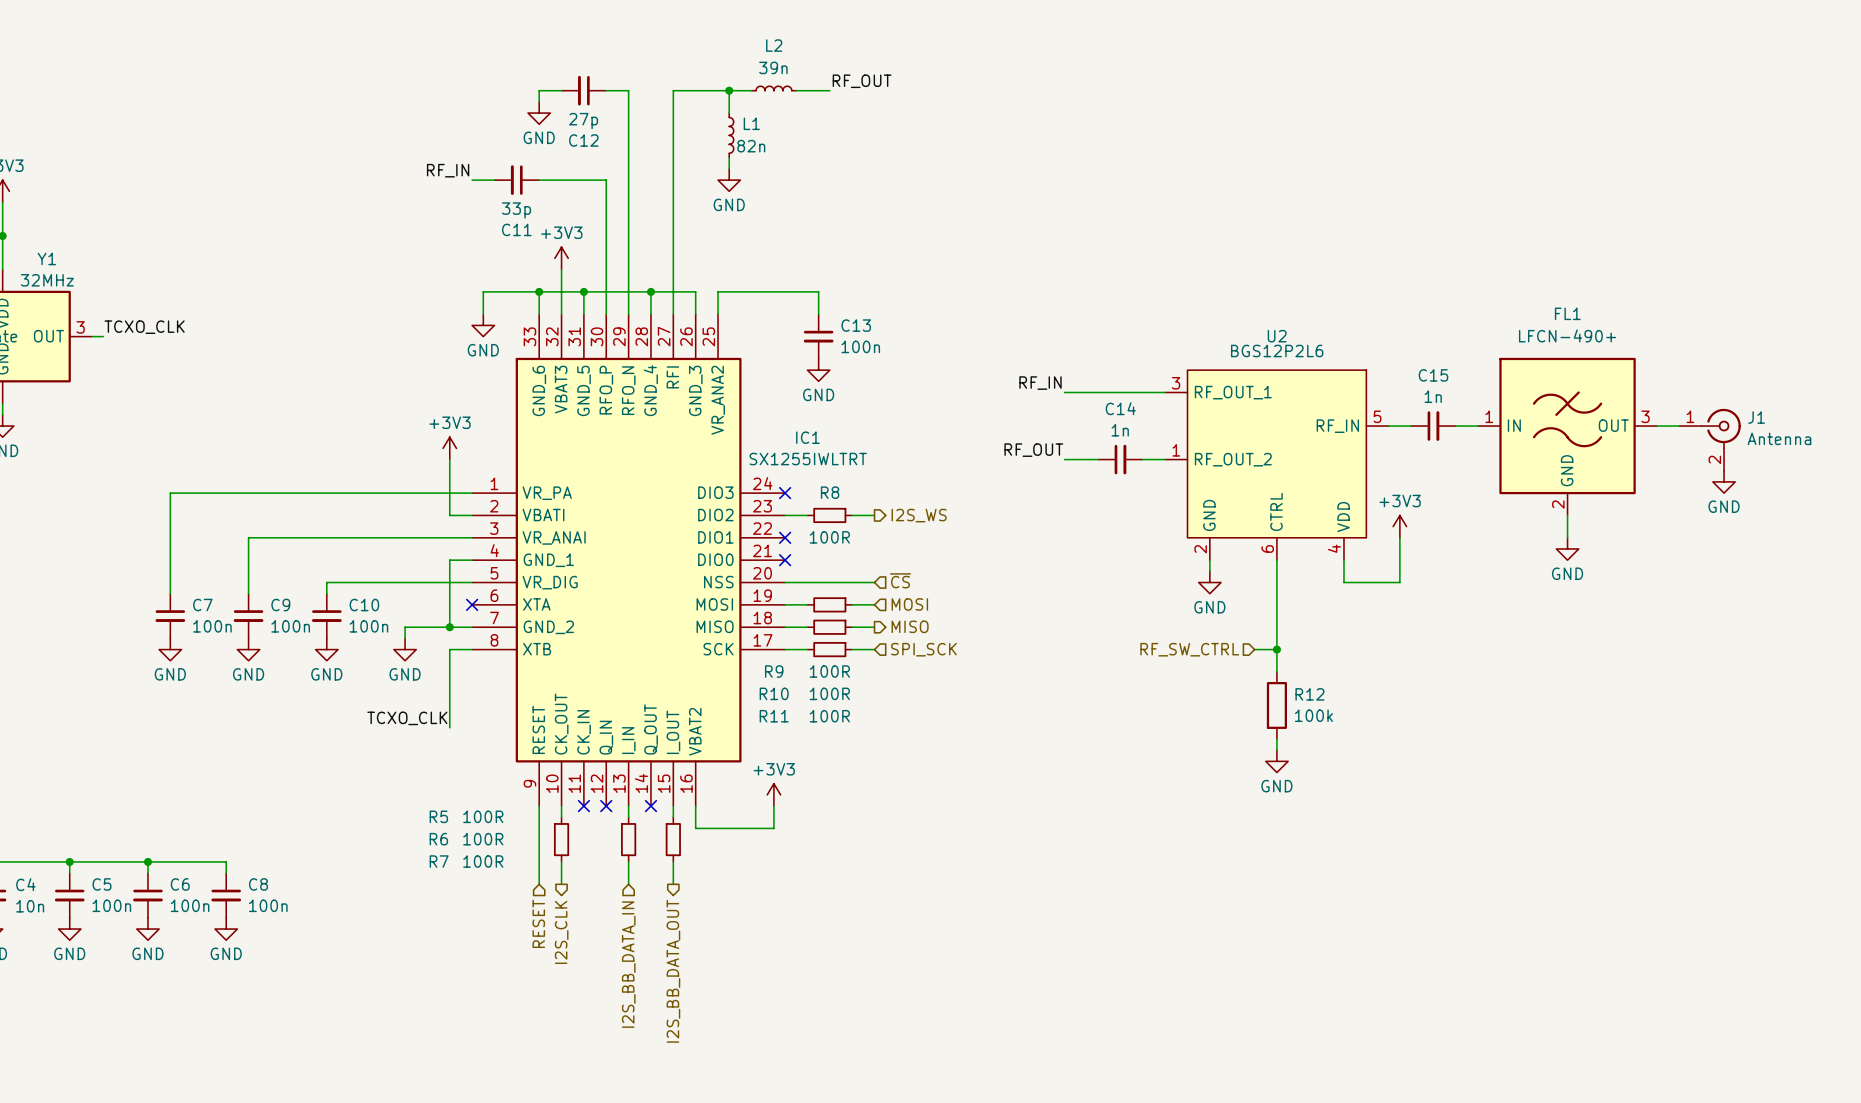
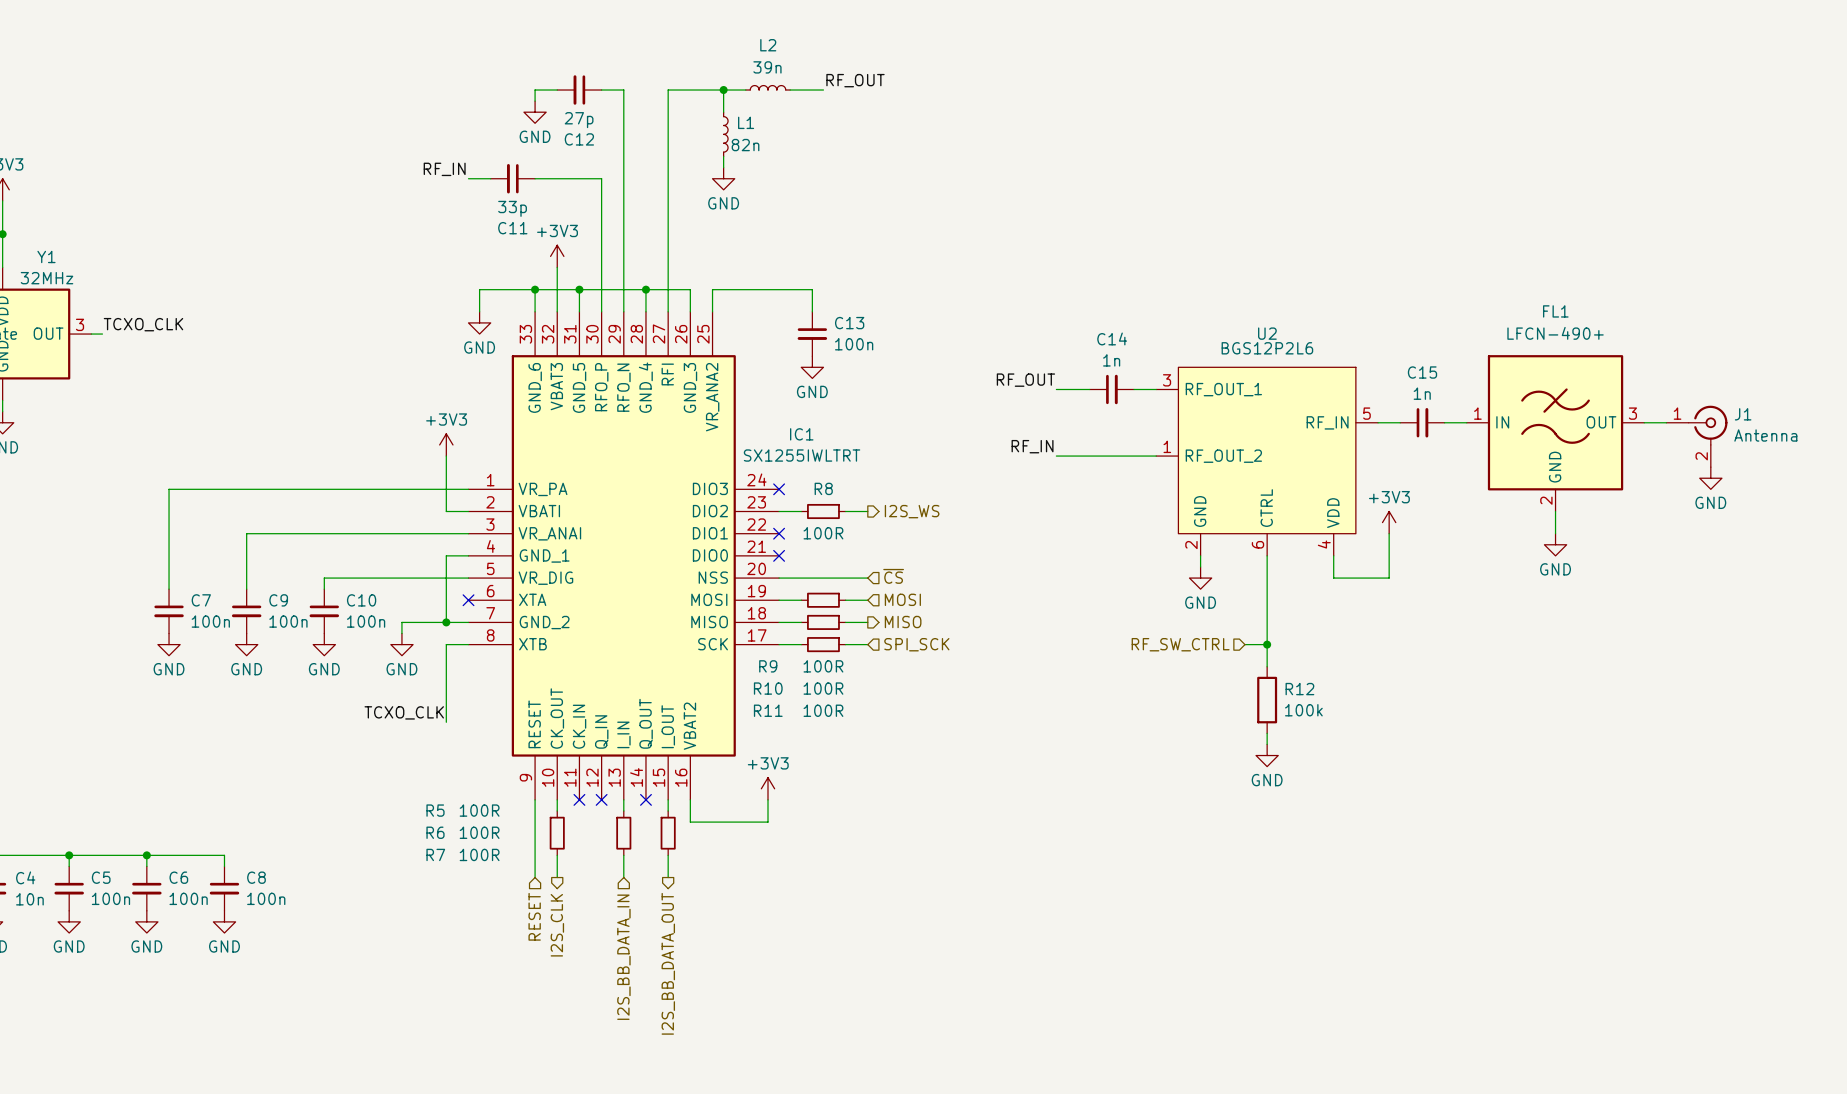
label: RF_IN (1040, 383) -> RF_OUT (1025, 380)
label: RF_OUT (1033, 450) -> RF_IN (1032, 446)
C14 position: (1120, 459) -> (1111, 389)

